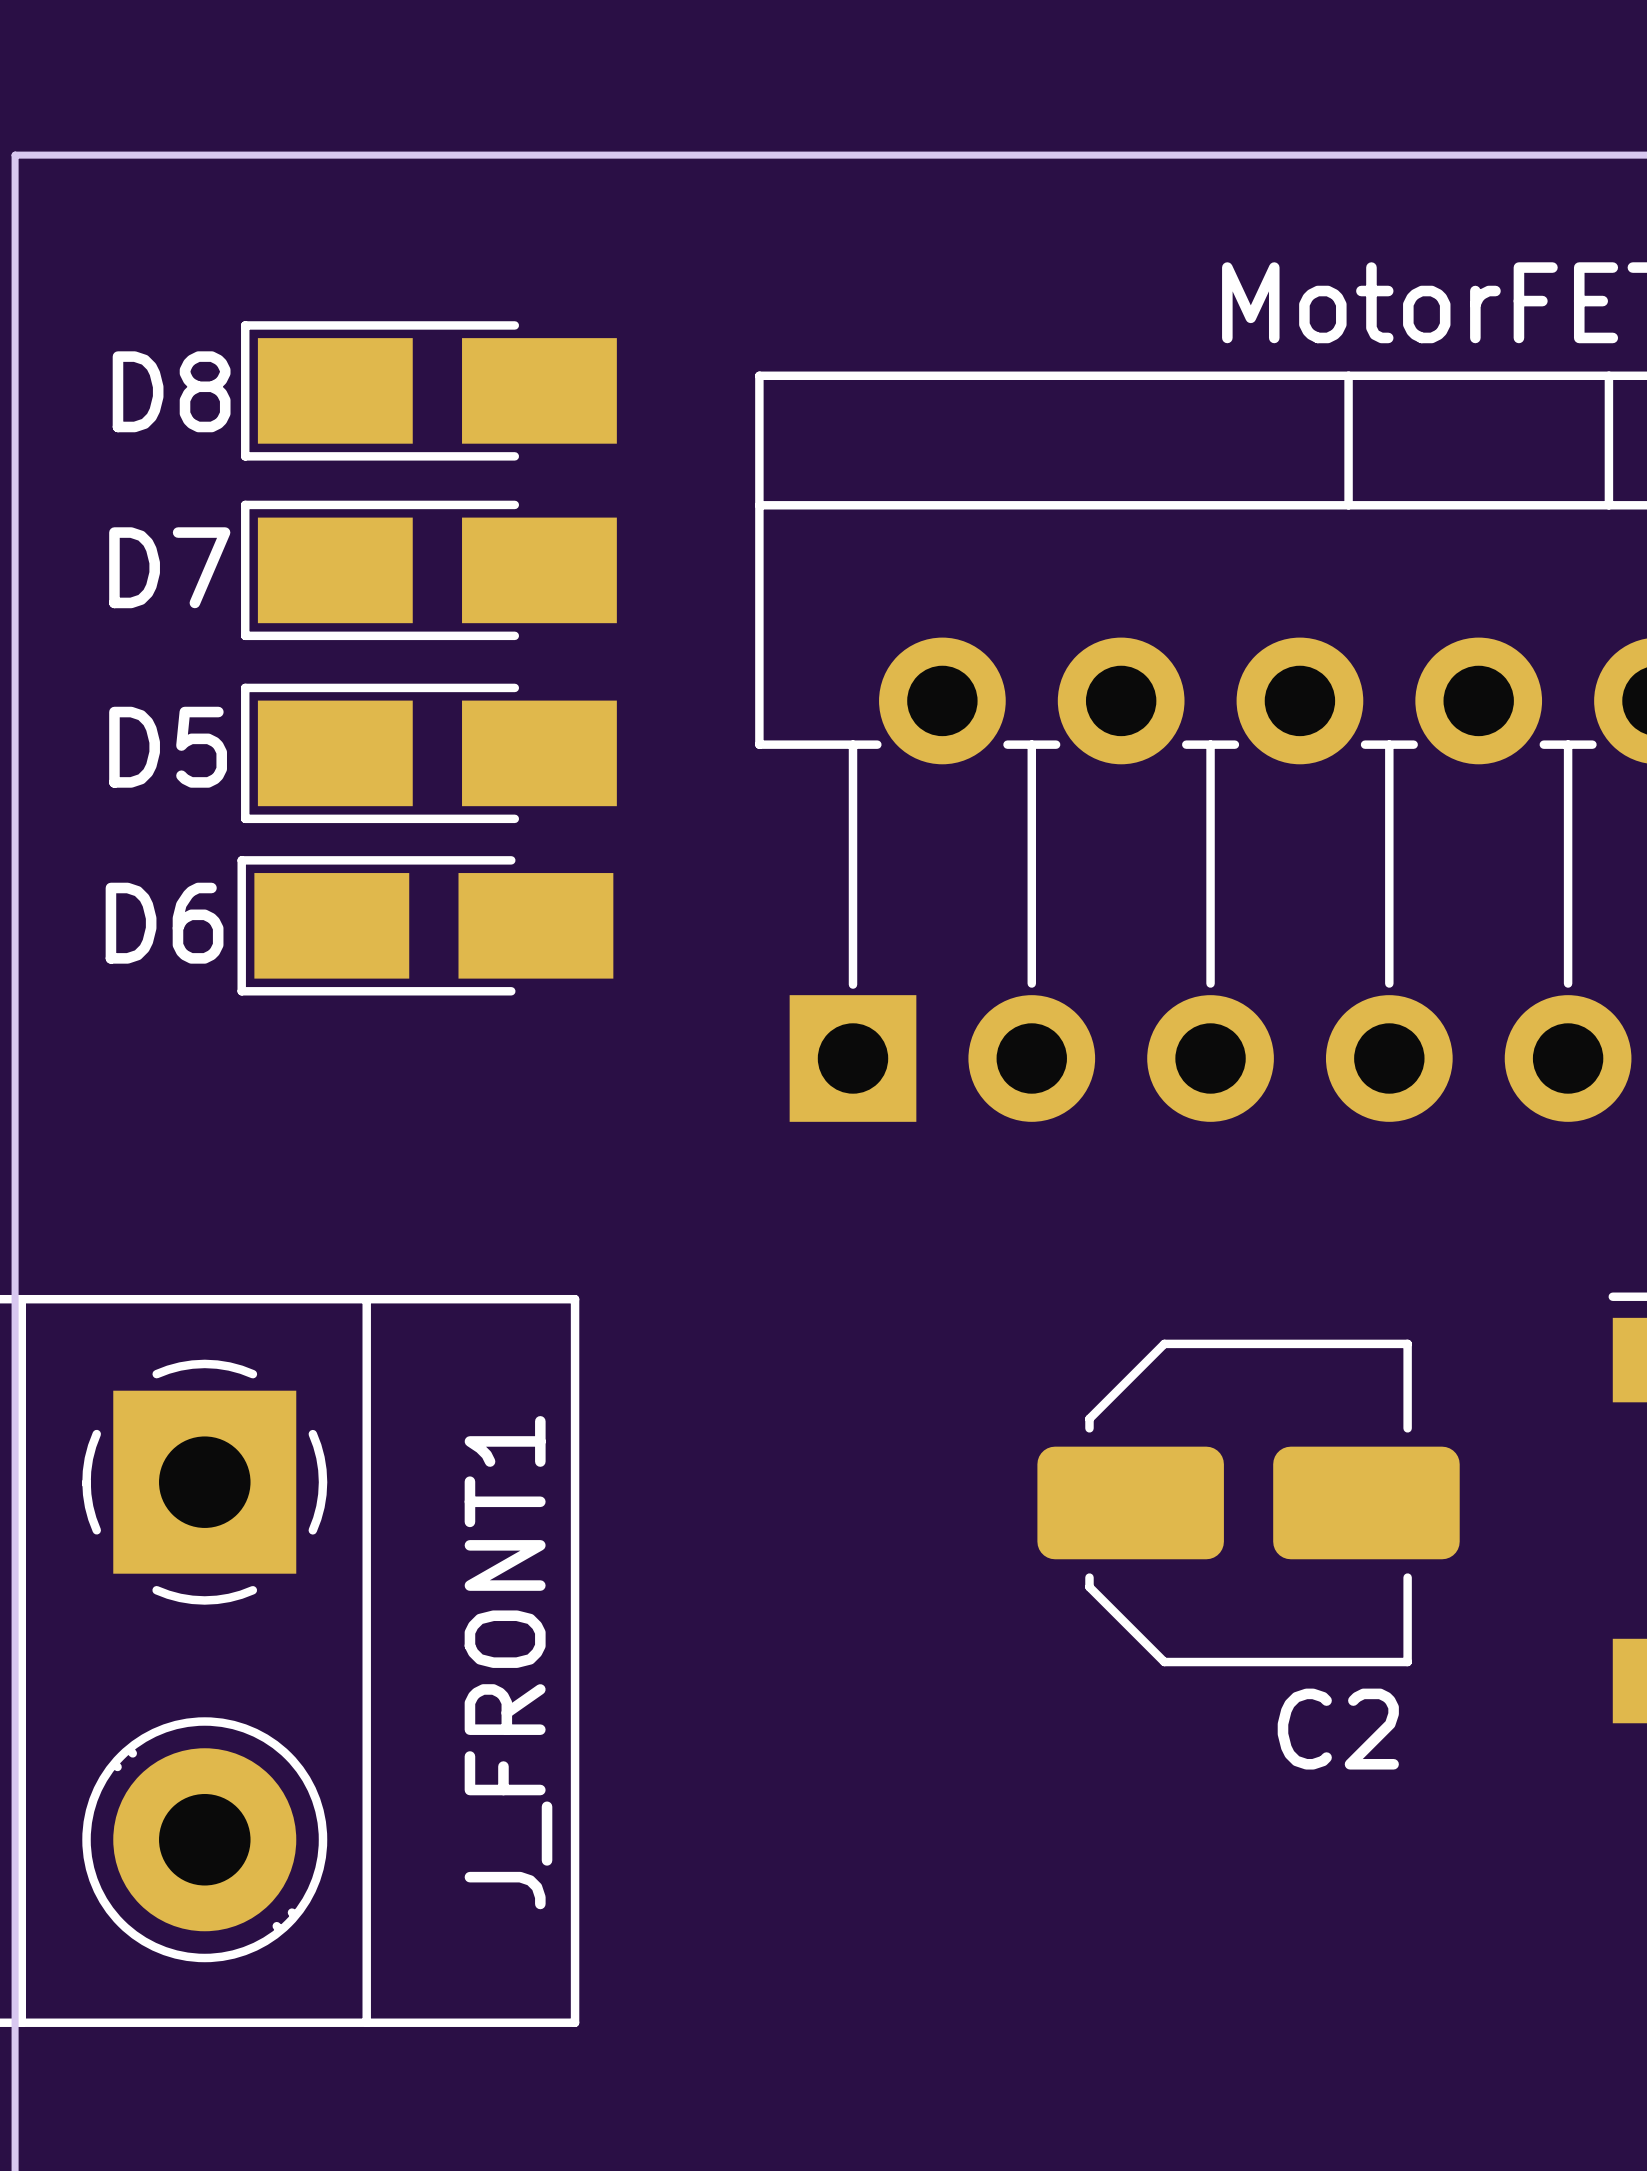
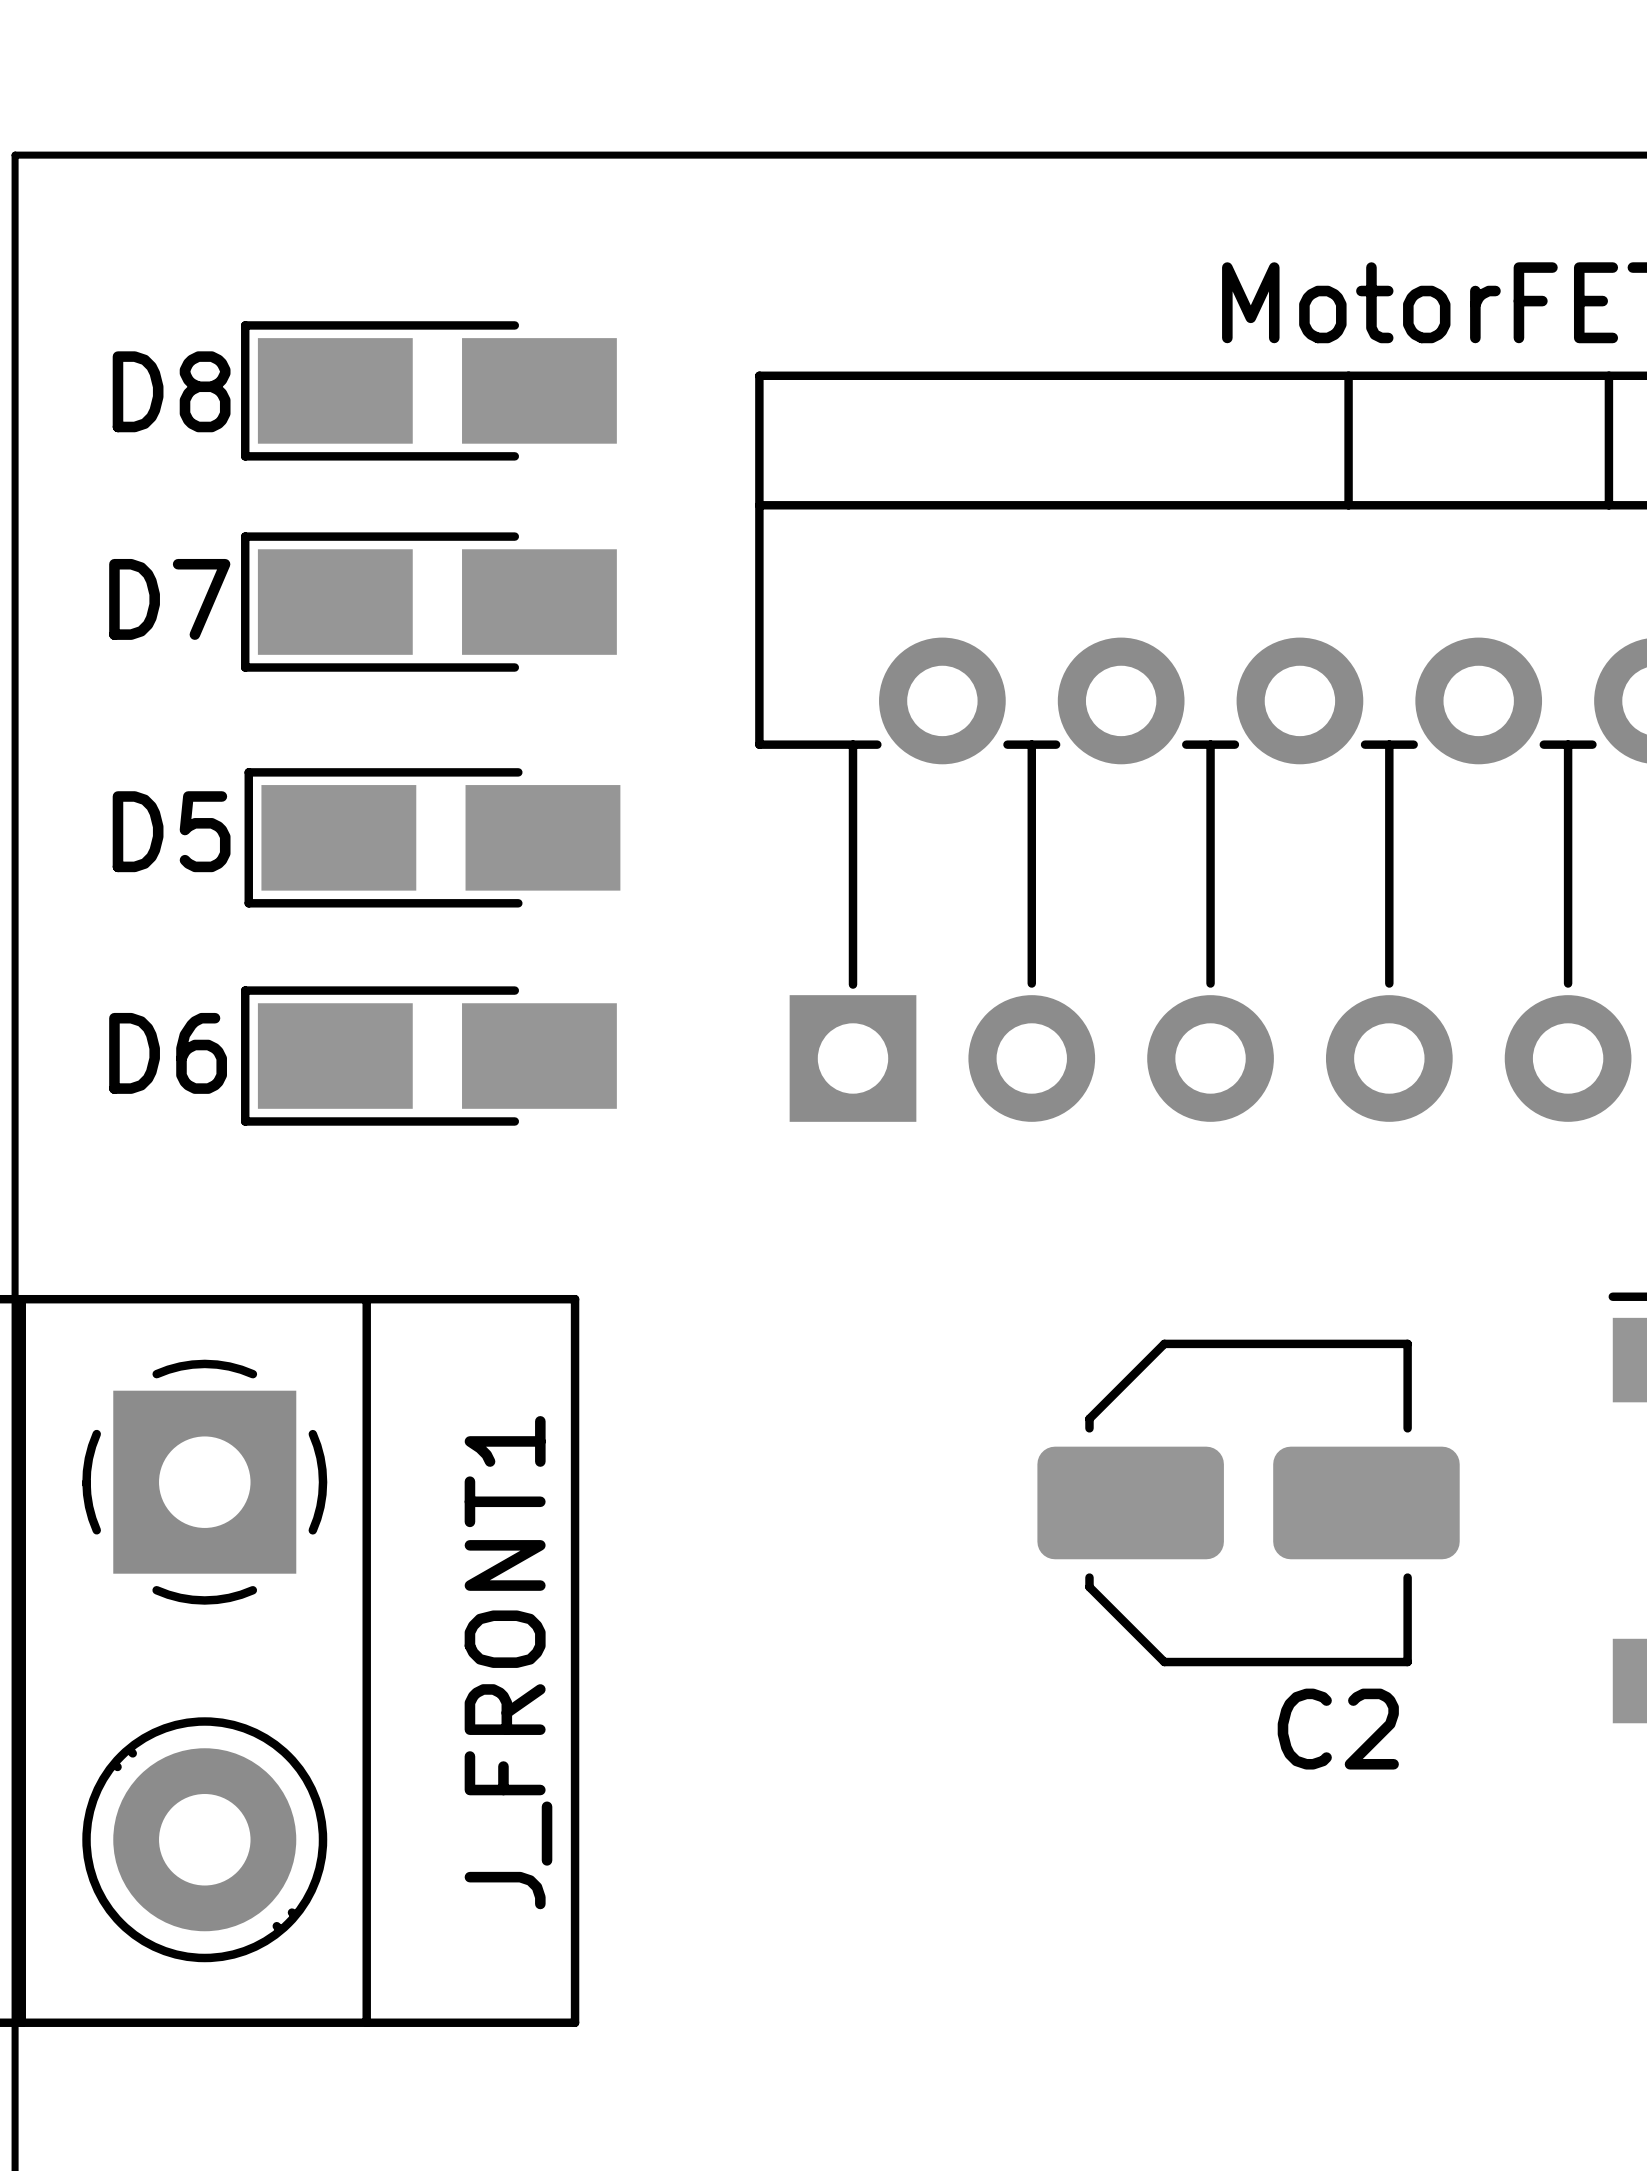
D7 position: (428, 570) -> (428, 602)
D5 position: (428, 753) -> (432, 837)
D6 position: (425, 925) -> (428, 1056)

